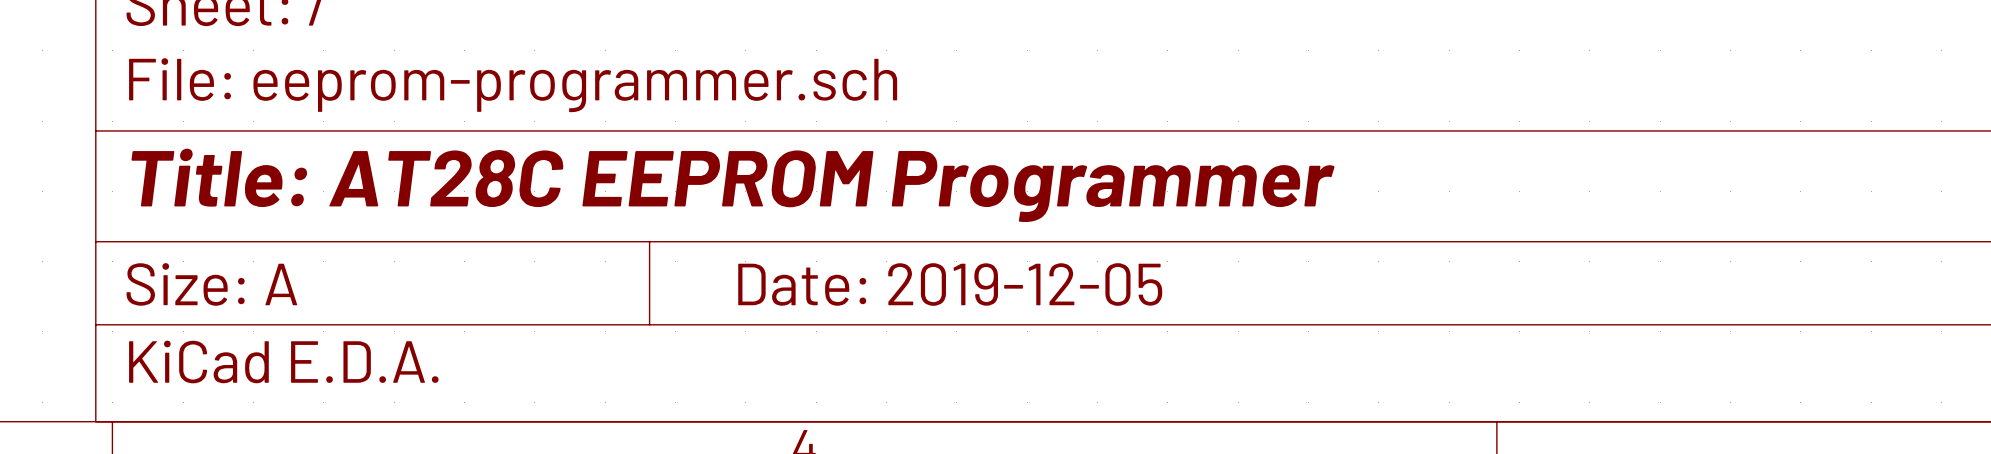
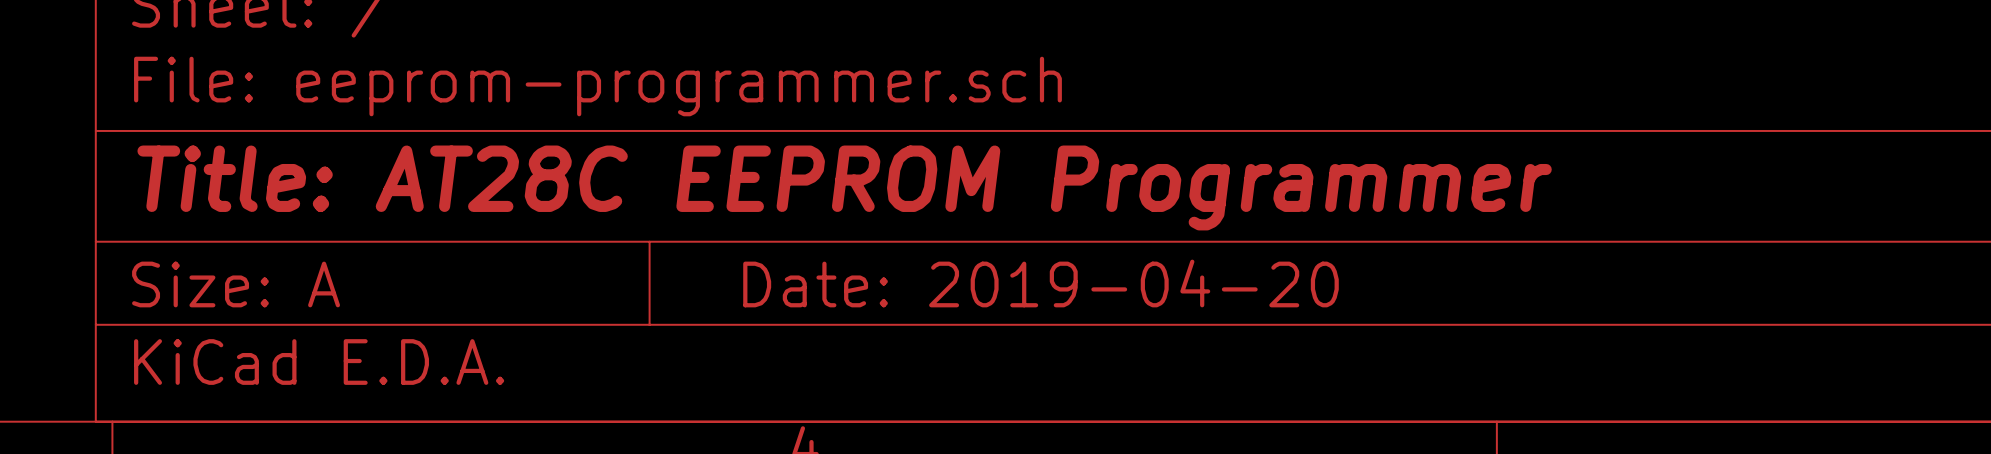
title block: Date: 2019-12-05 (950, 284) -> Date: 2019-04-20 (1041, 283)

